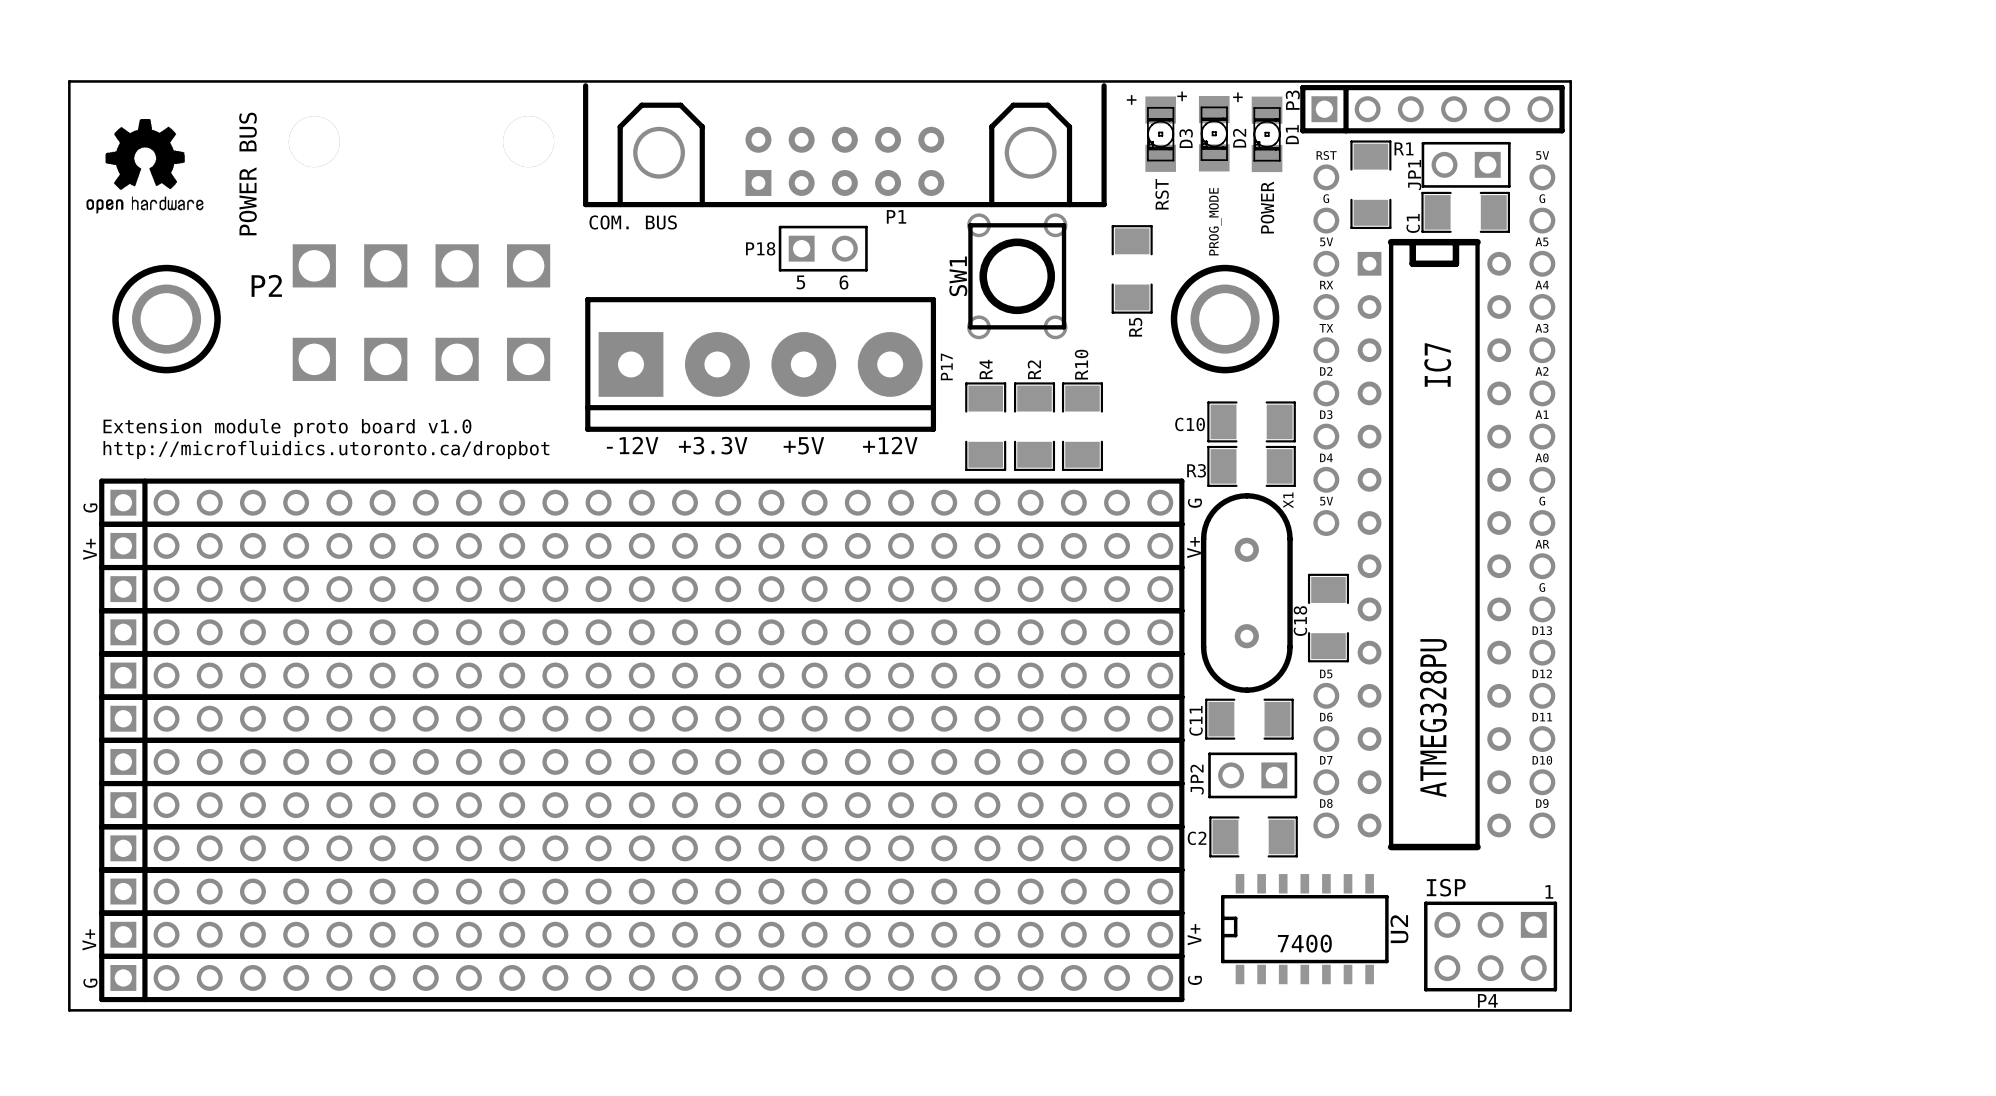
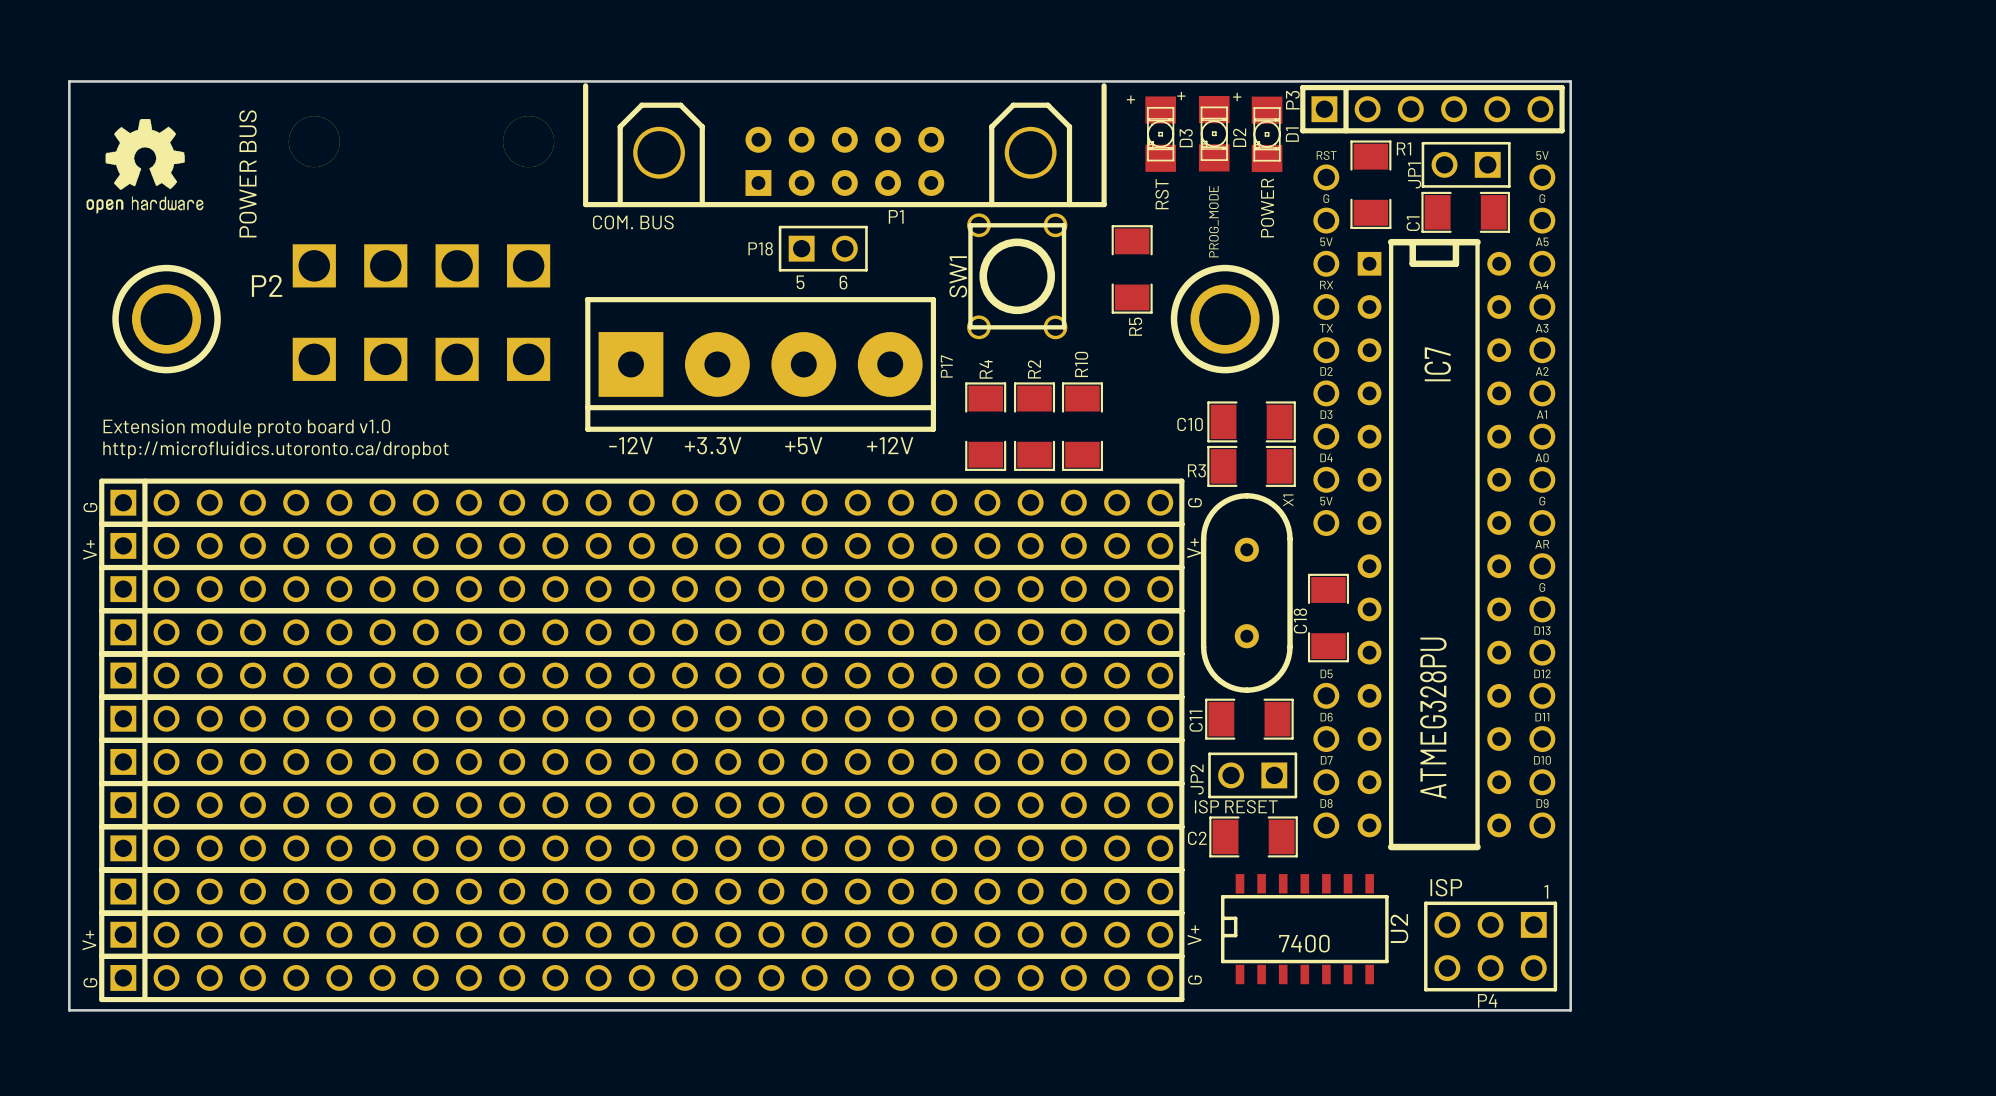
JP2 value: none -> ISP RESET (1236, 806)

